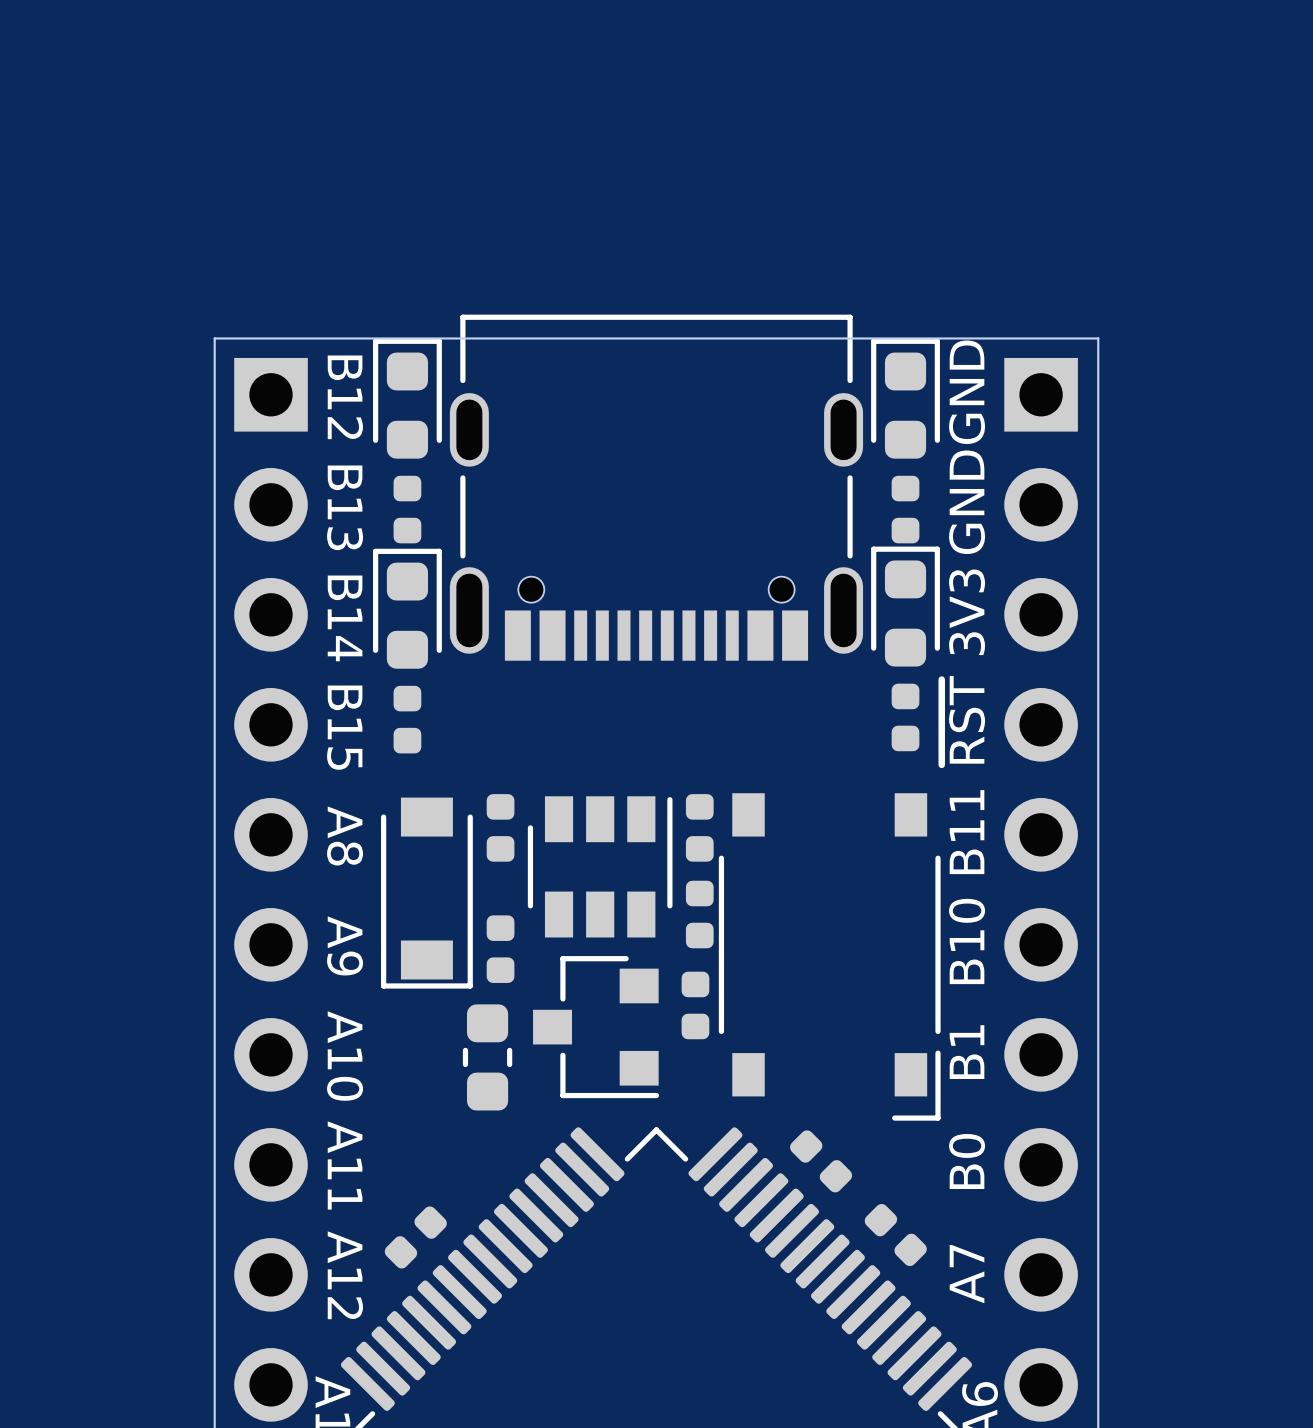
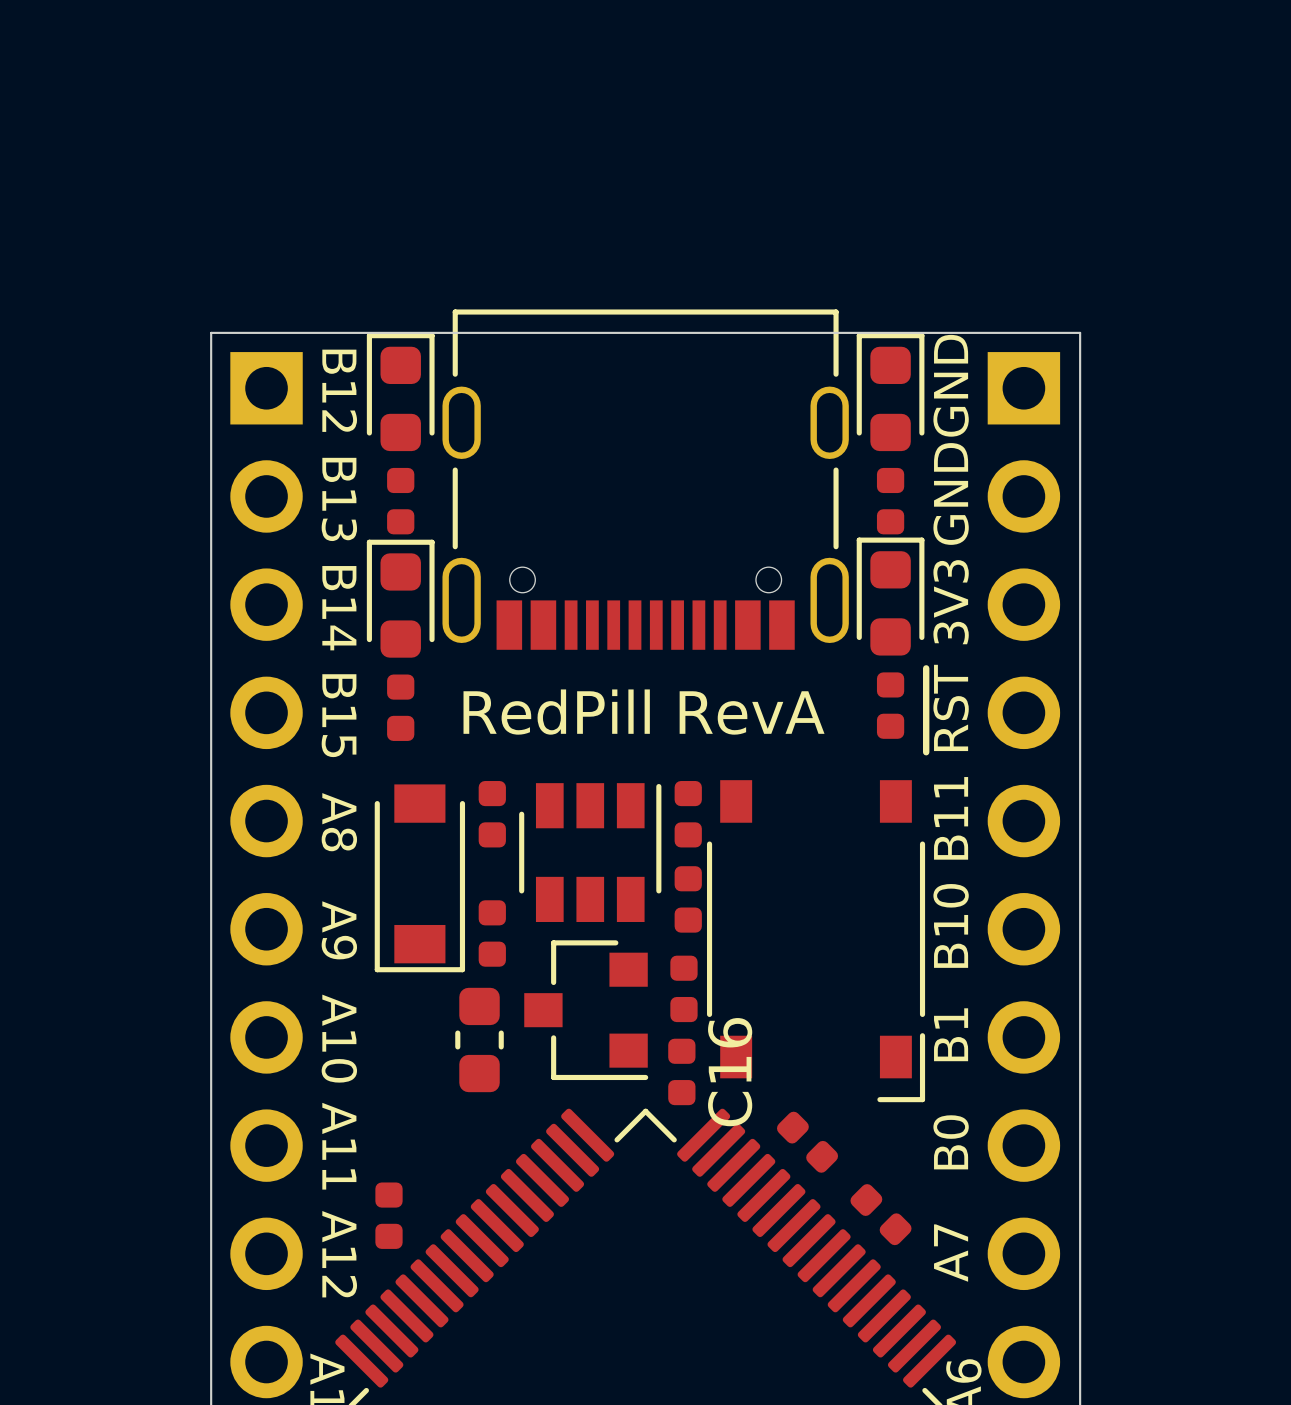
text: none -> RedPill RevA (644, 712)
C16: none -> (681, 1071)
part rotation: 0° (415, 1237) -> 45° counterclockwise (389, 1215)

